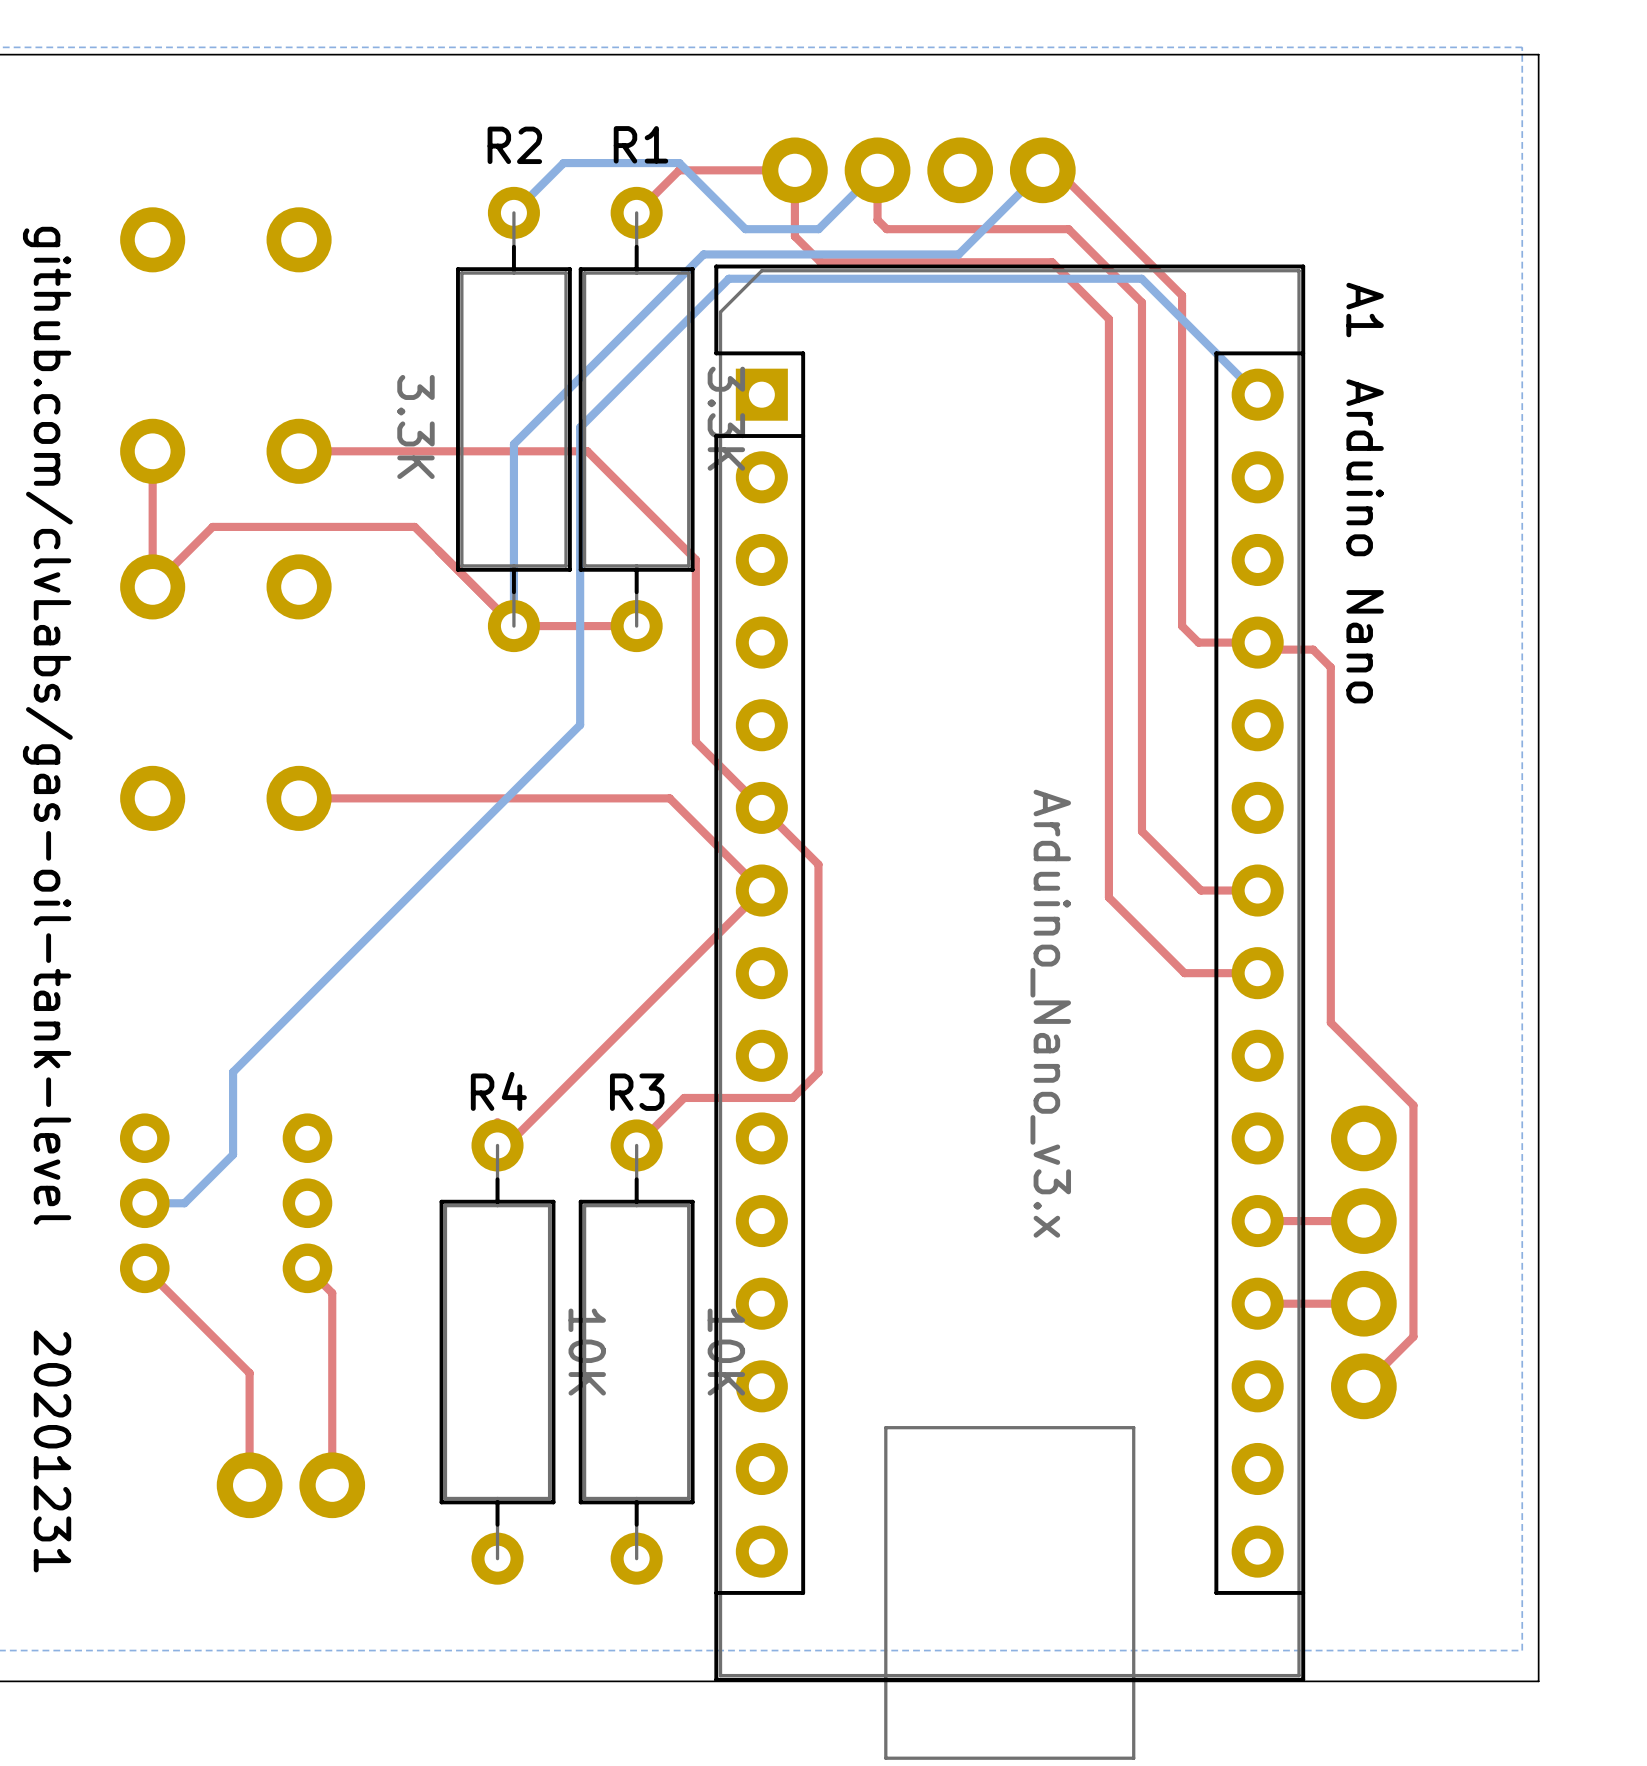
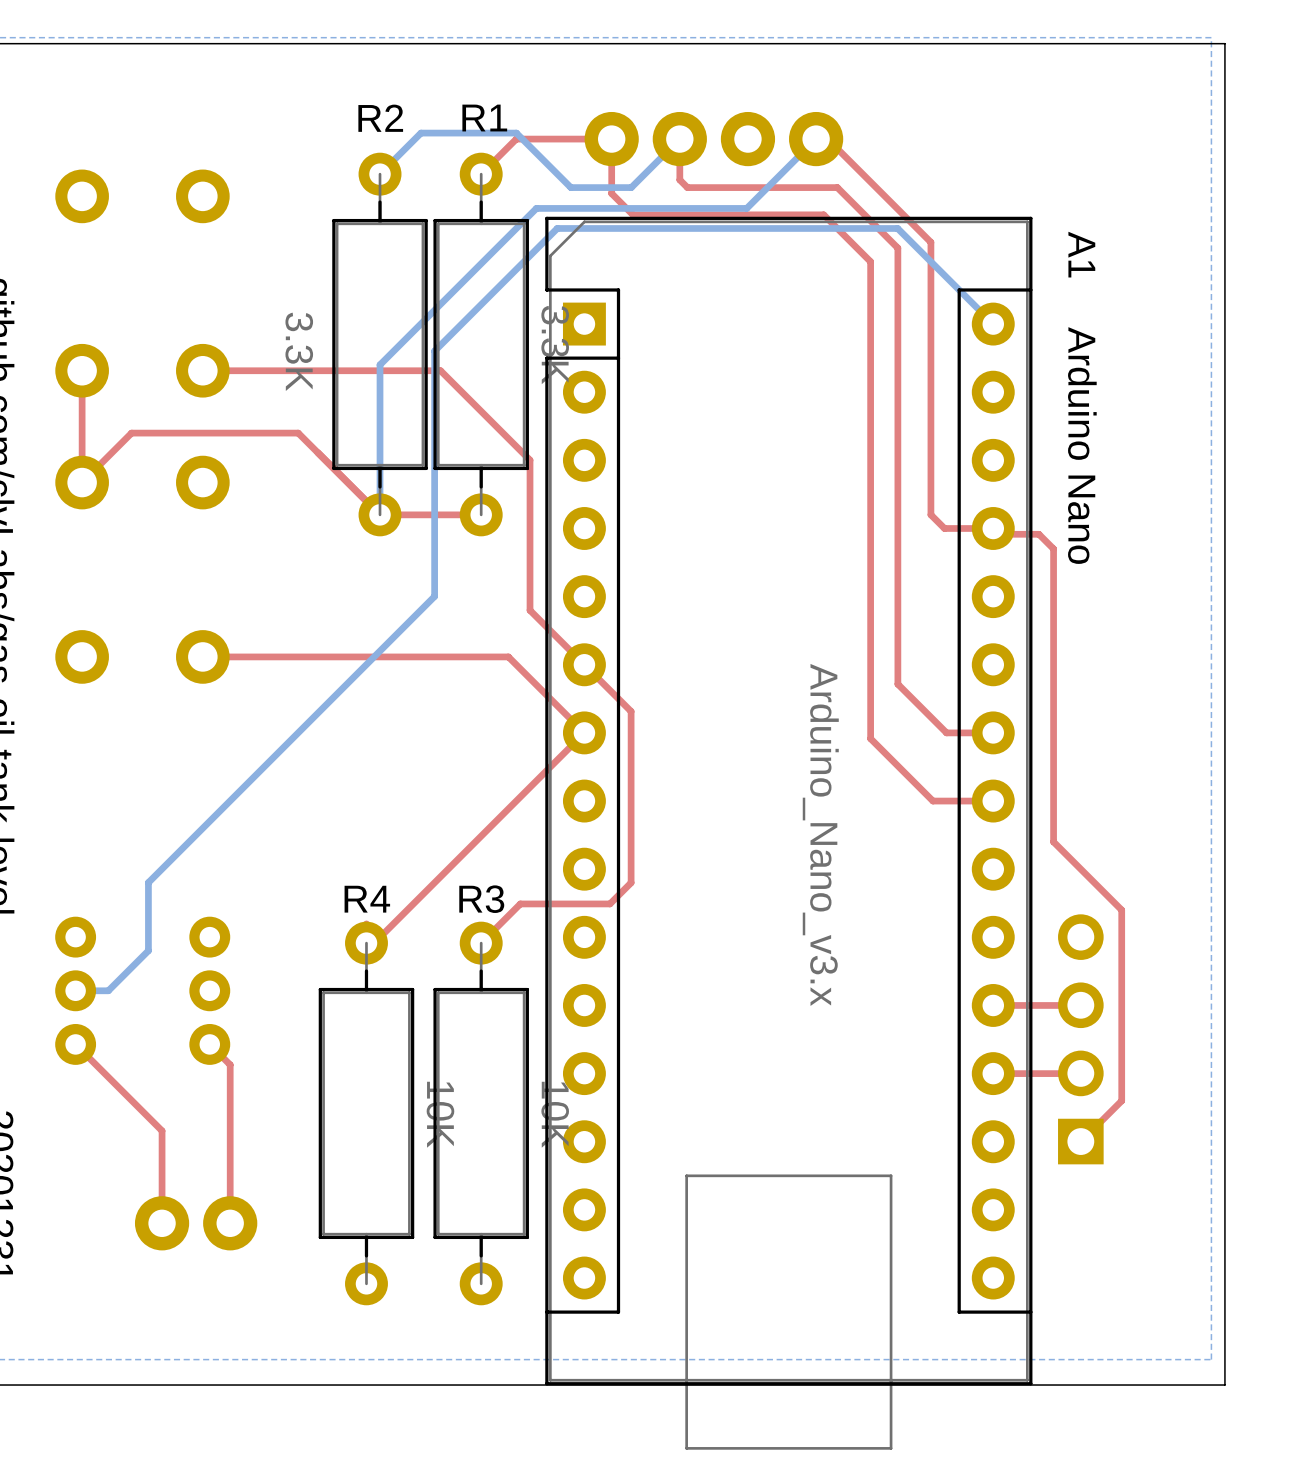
part footprint: [1331, 1105, 1397, 1420] -> [1058, 914, 1104, 1165]

